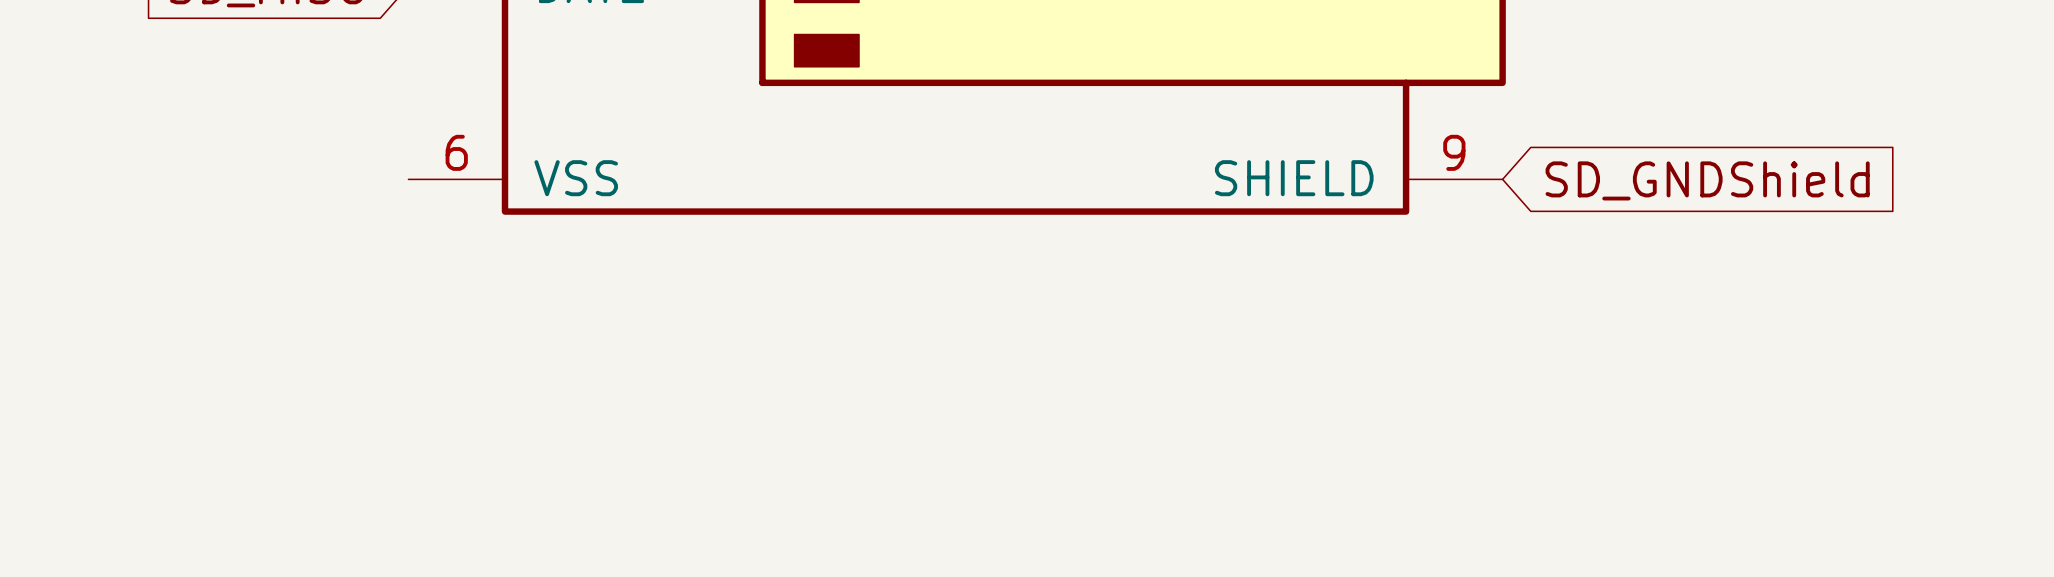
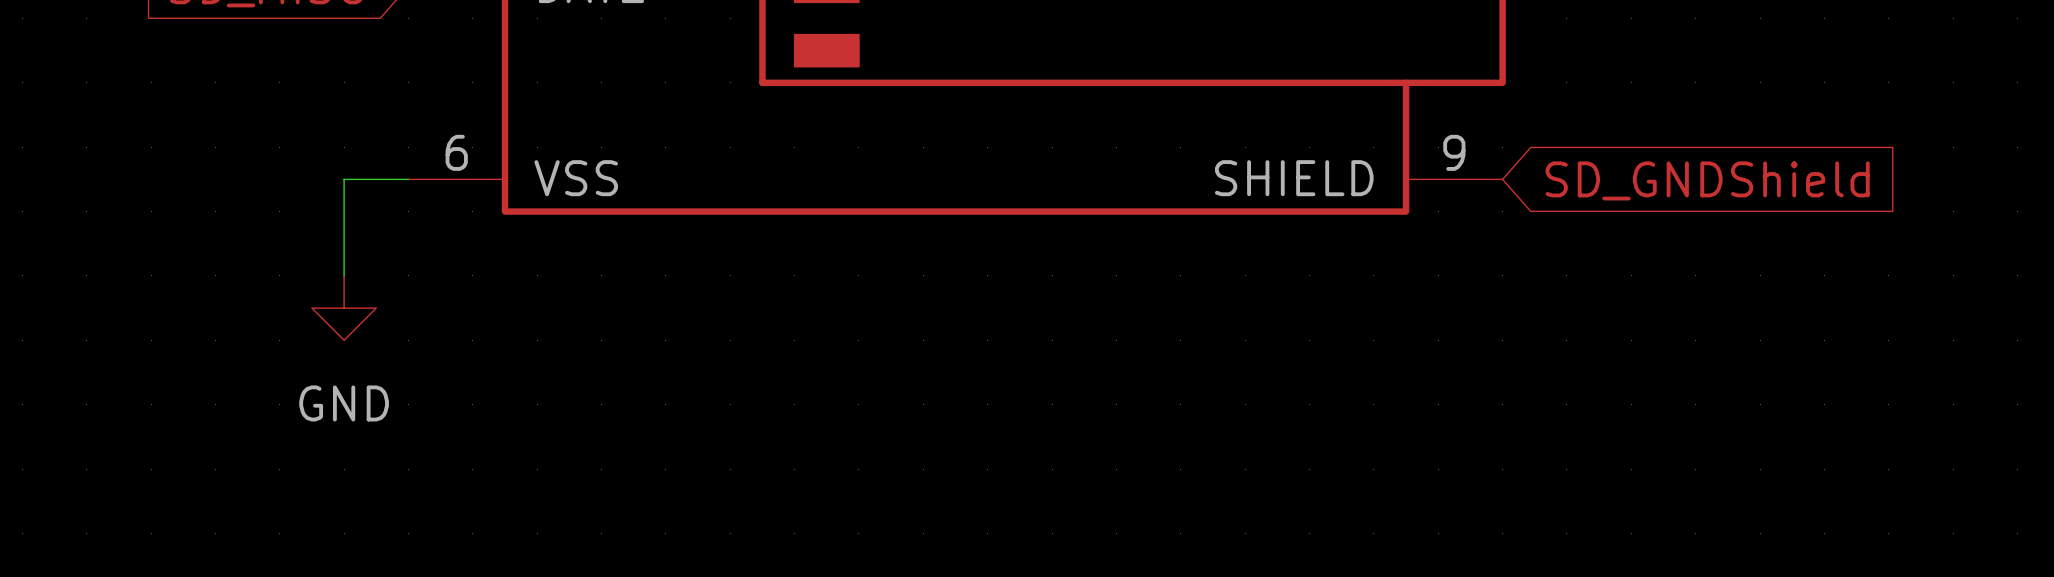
wire: none -> (408, 179) (344, 179) (344, 275)
power symbol: none -> GND (344, 308)

